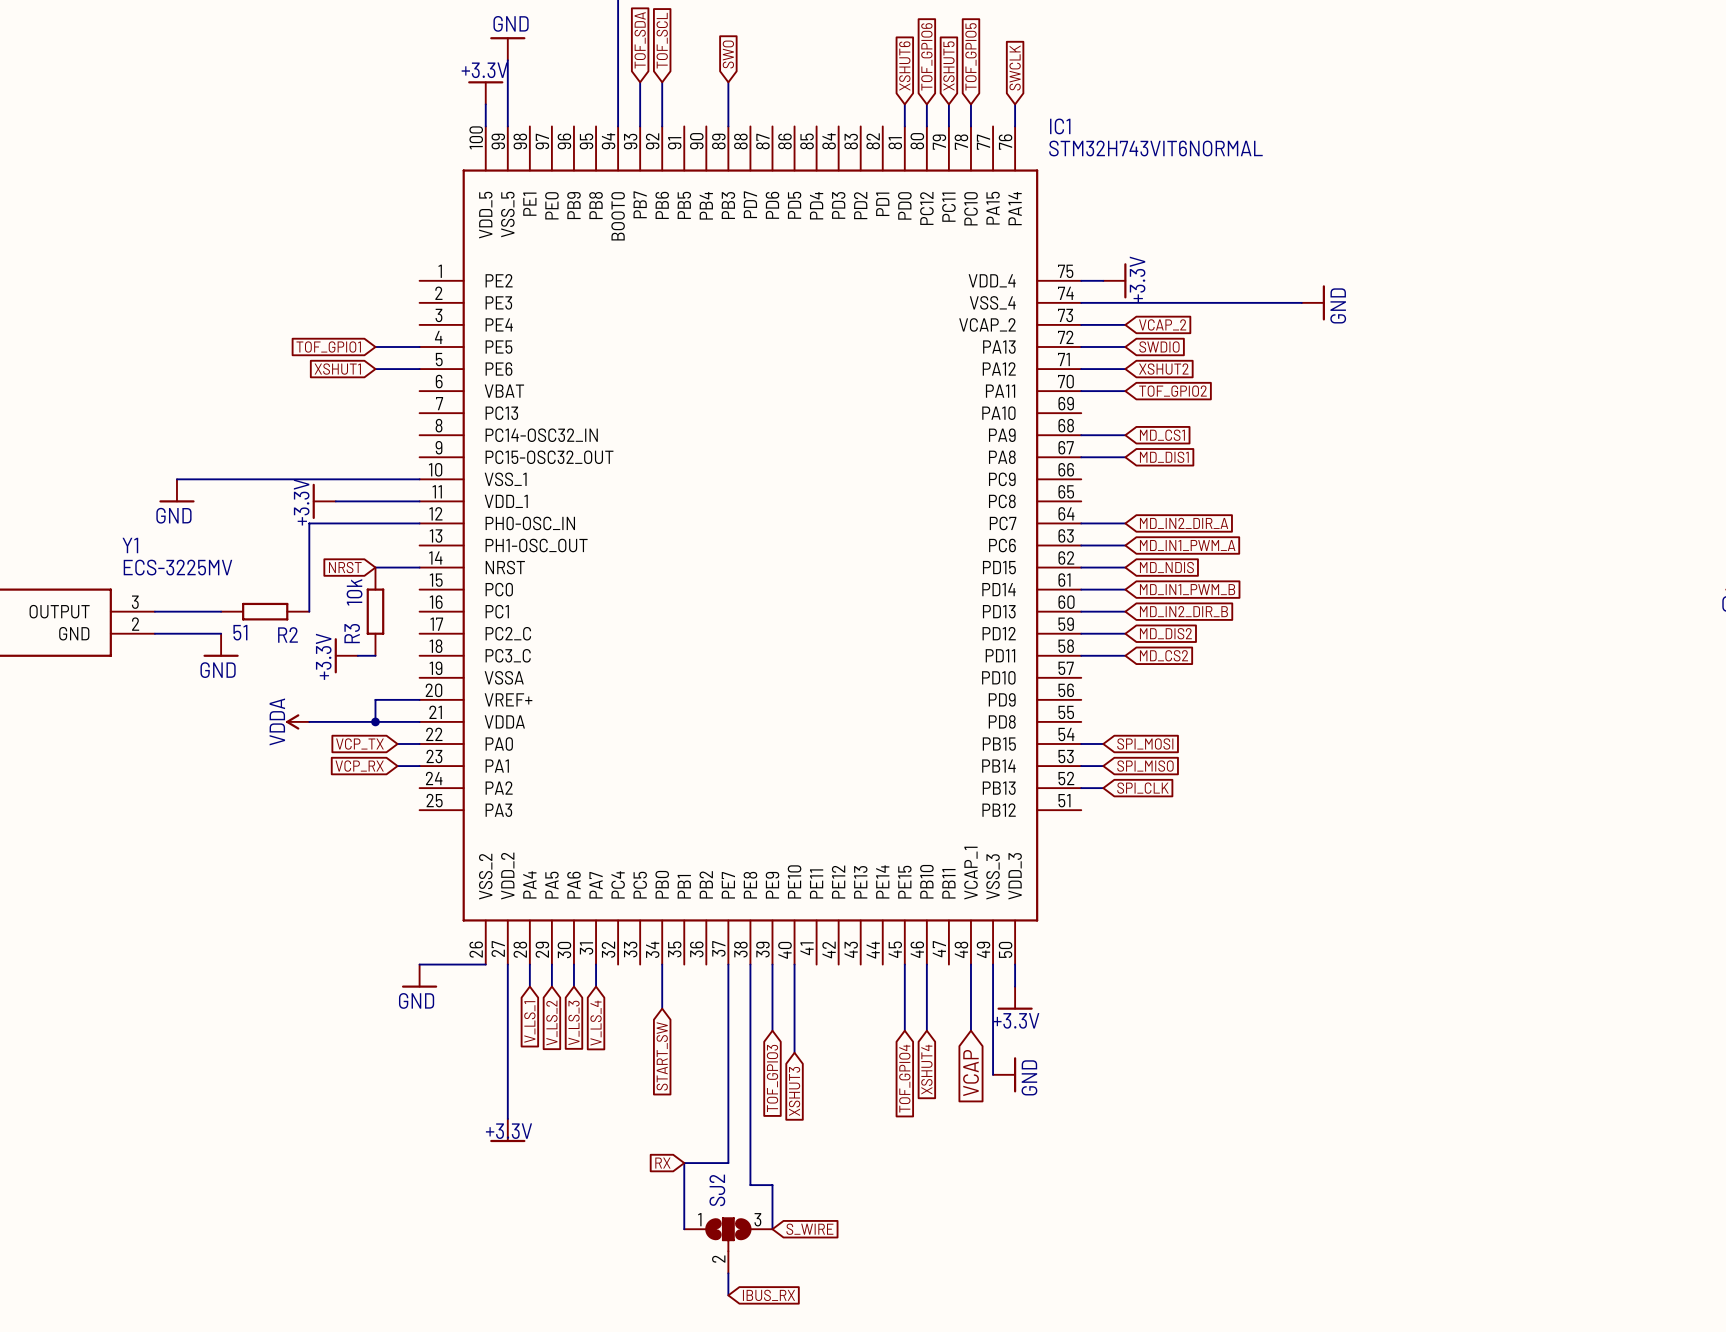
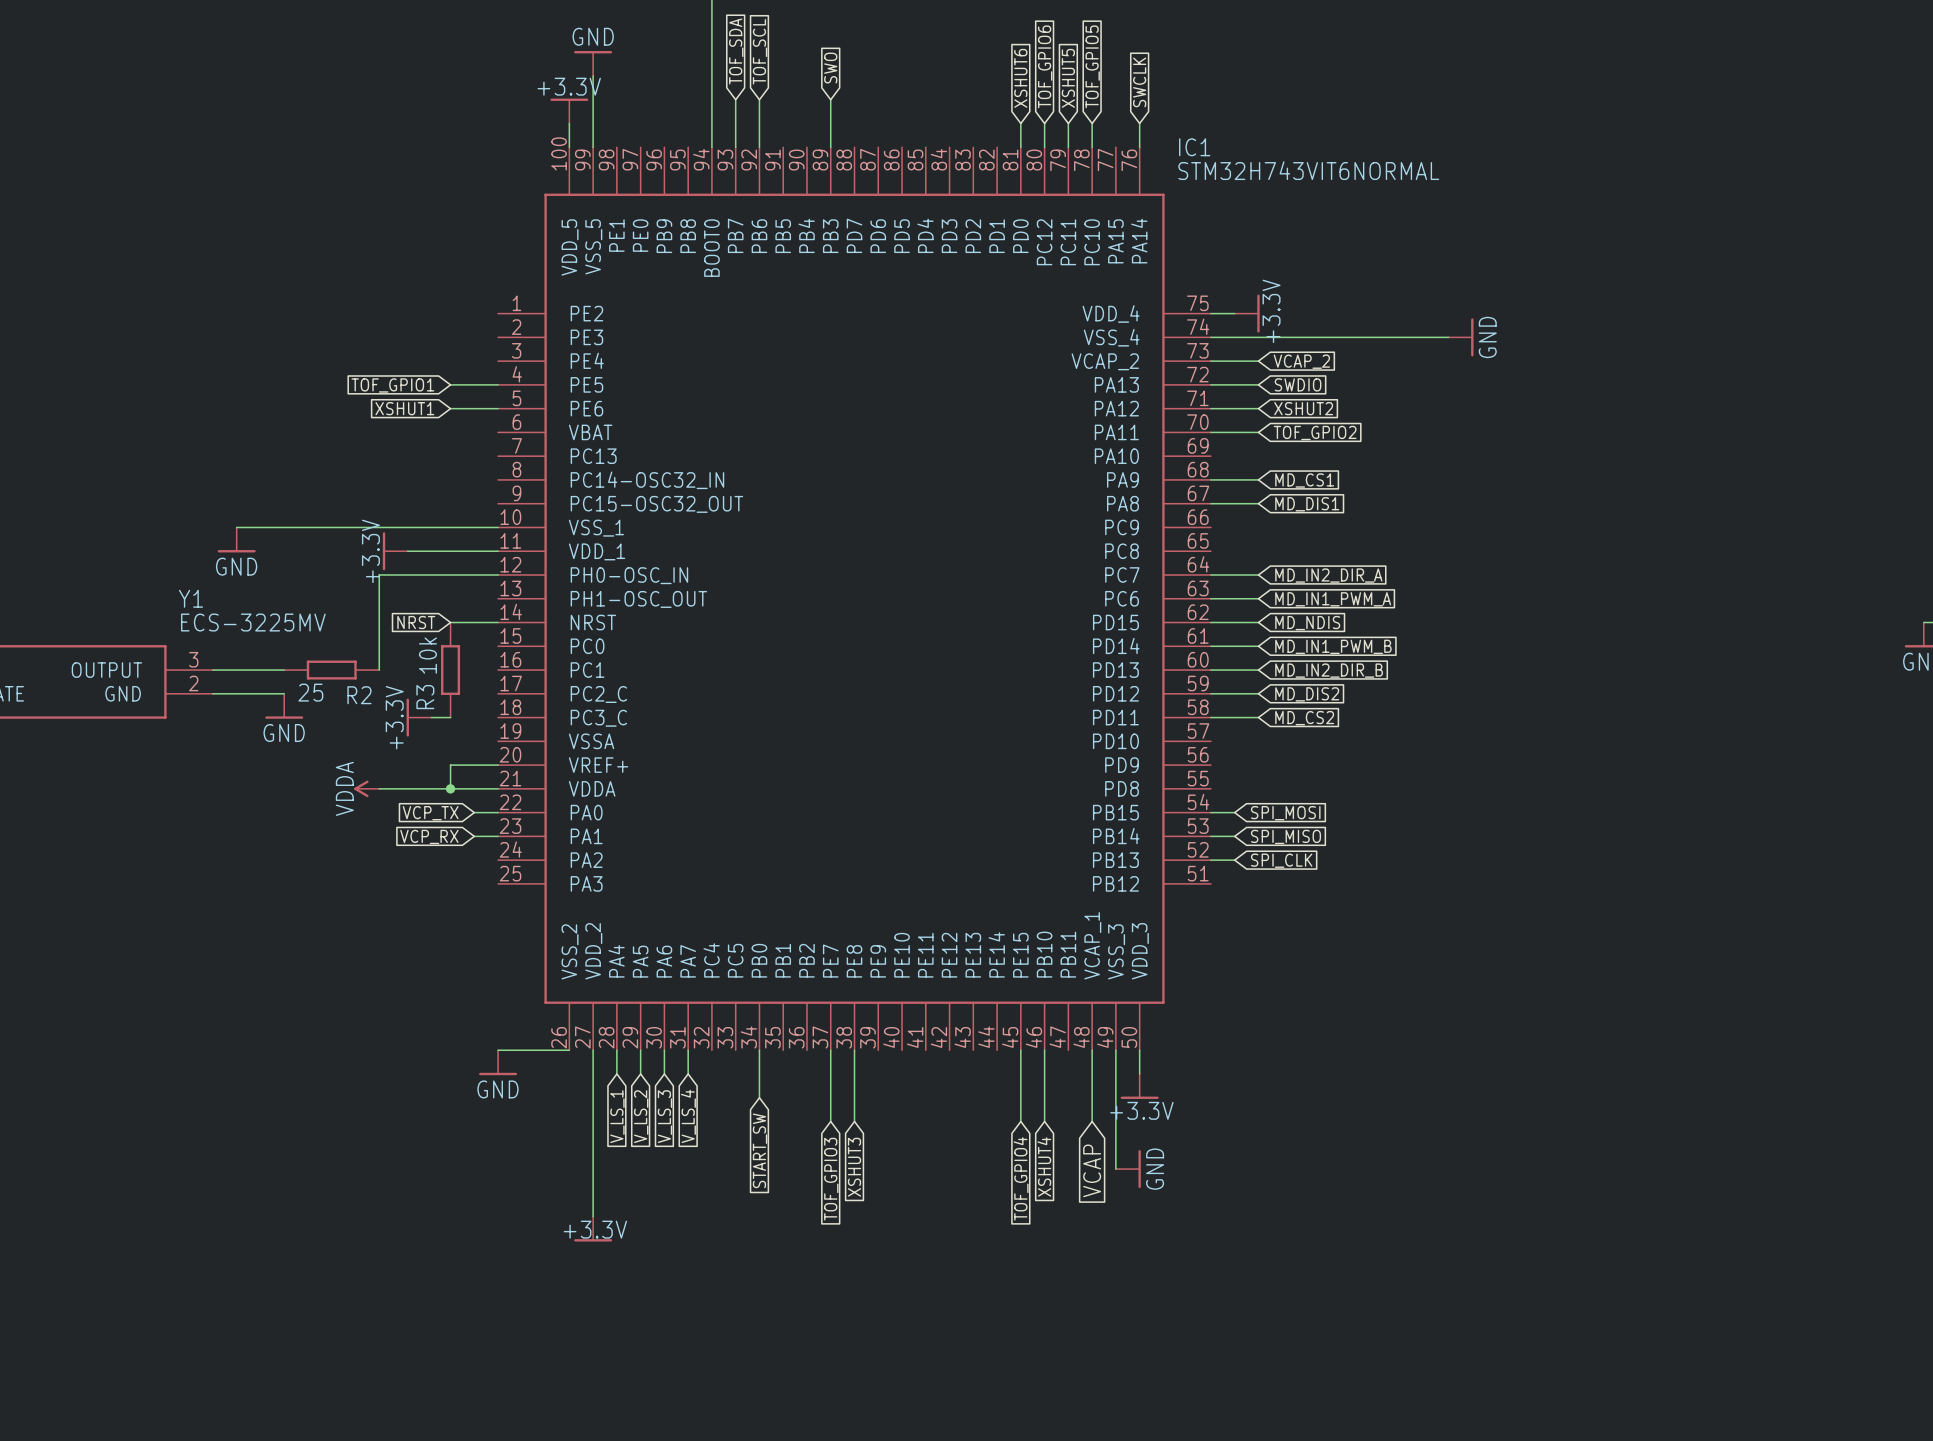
R2 value: 51 (240, 632) -> 25 (310, 692)
wire: (772, 964) (772, 1030) -> none
wire: (794, 964) (794, 1052) -> none
wire: (728, 1030) (728, 1163) (684, 1163) (684, 1229) -> none
wire: (750, 1030) (750, 1185) (772, 1185) (772, 1229) -> none
global label position: TOF_GPIO3 (772, 1078) -> TOF_GPIO3 (831, 1179)
global label position: XSHUT3 (794, 1091) -> XSHUT3 (854, 1167)
global label: RX (662, 1163) -> none
global label: S_WIRE (809, 1229) -> none
SJ2: (728, 1245) -> none
wire: (728, 1273) (728, 1295) -> none
global label: IBUS_RX (768, 1295) -> none

